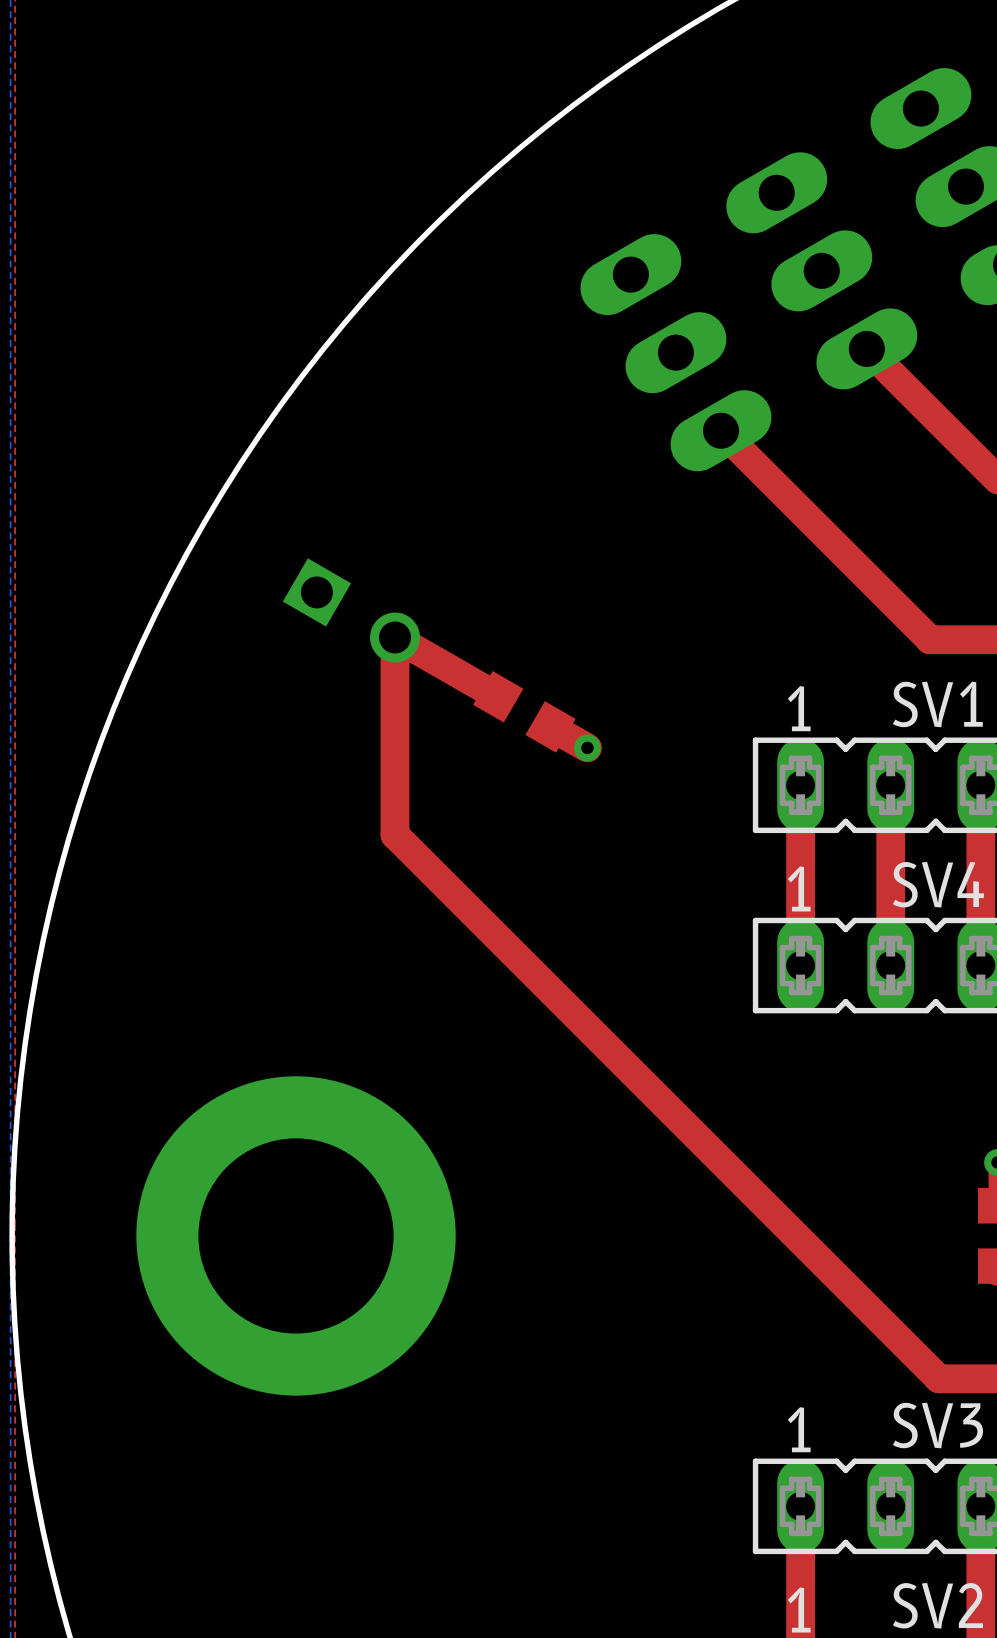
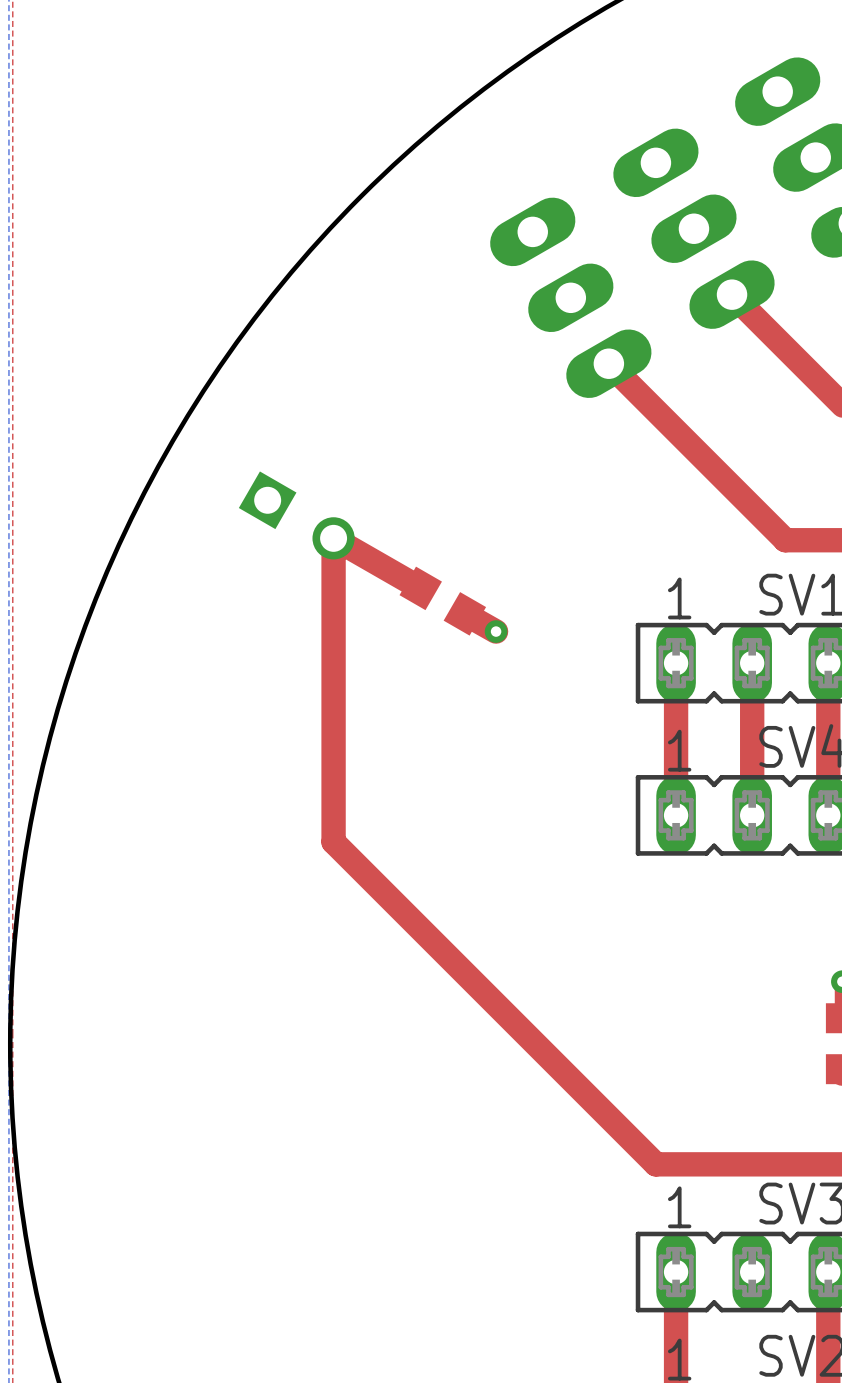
top track: (395, 834) (938, 1378) -> (333, 705) (333, 842) (655, 1164) (792, 1164)
part: (296, 1235) -> none

